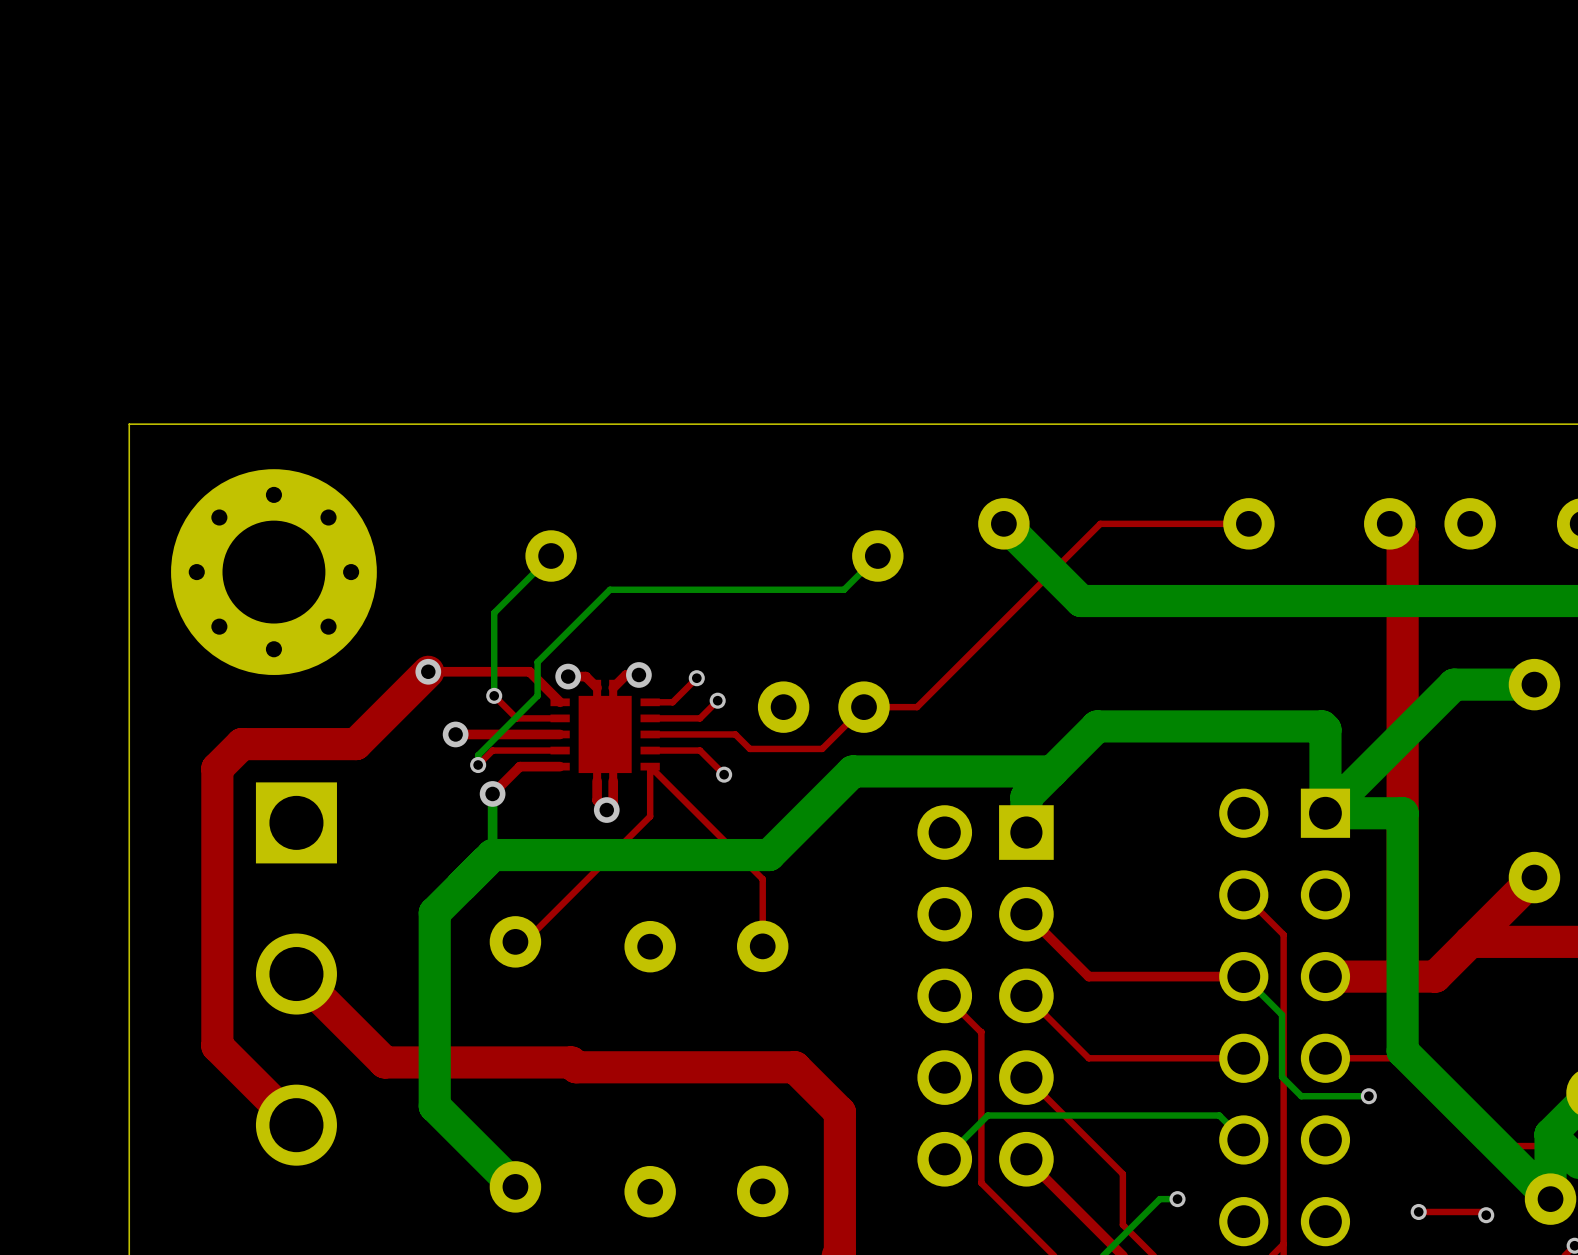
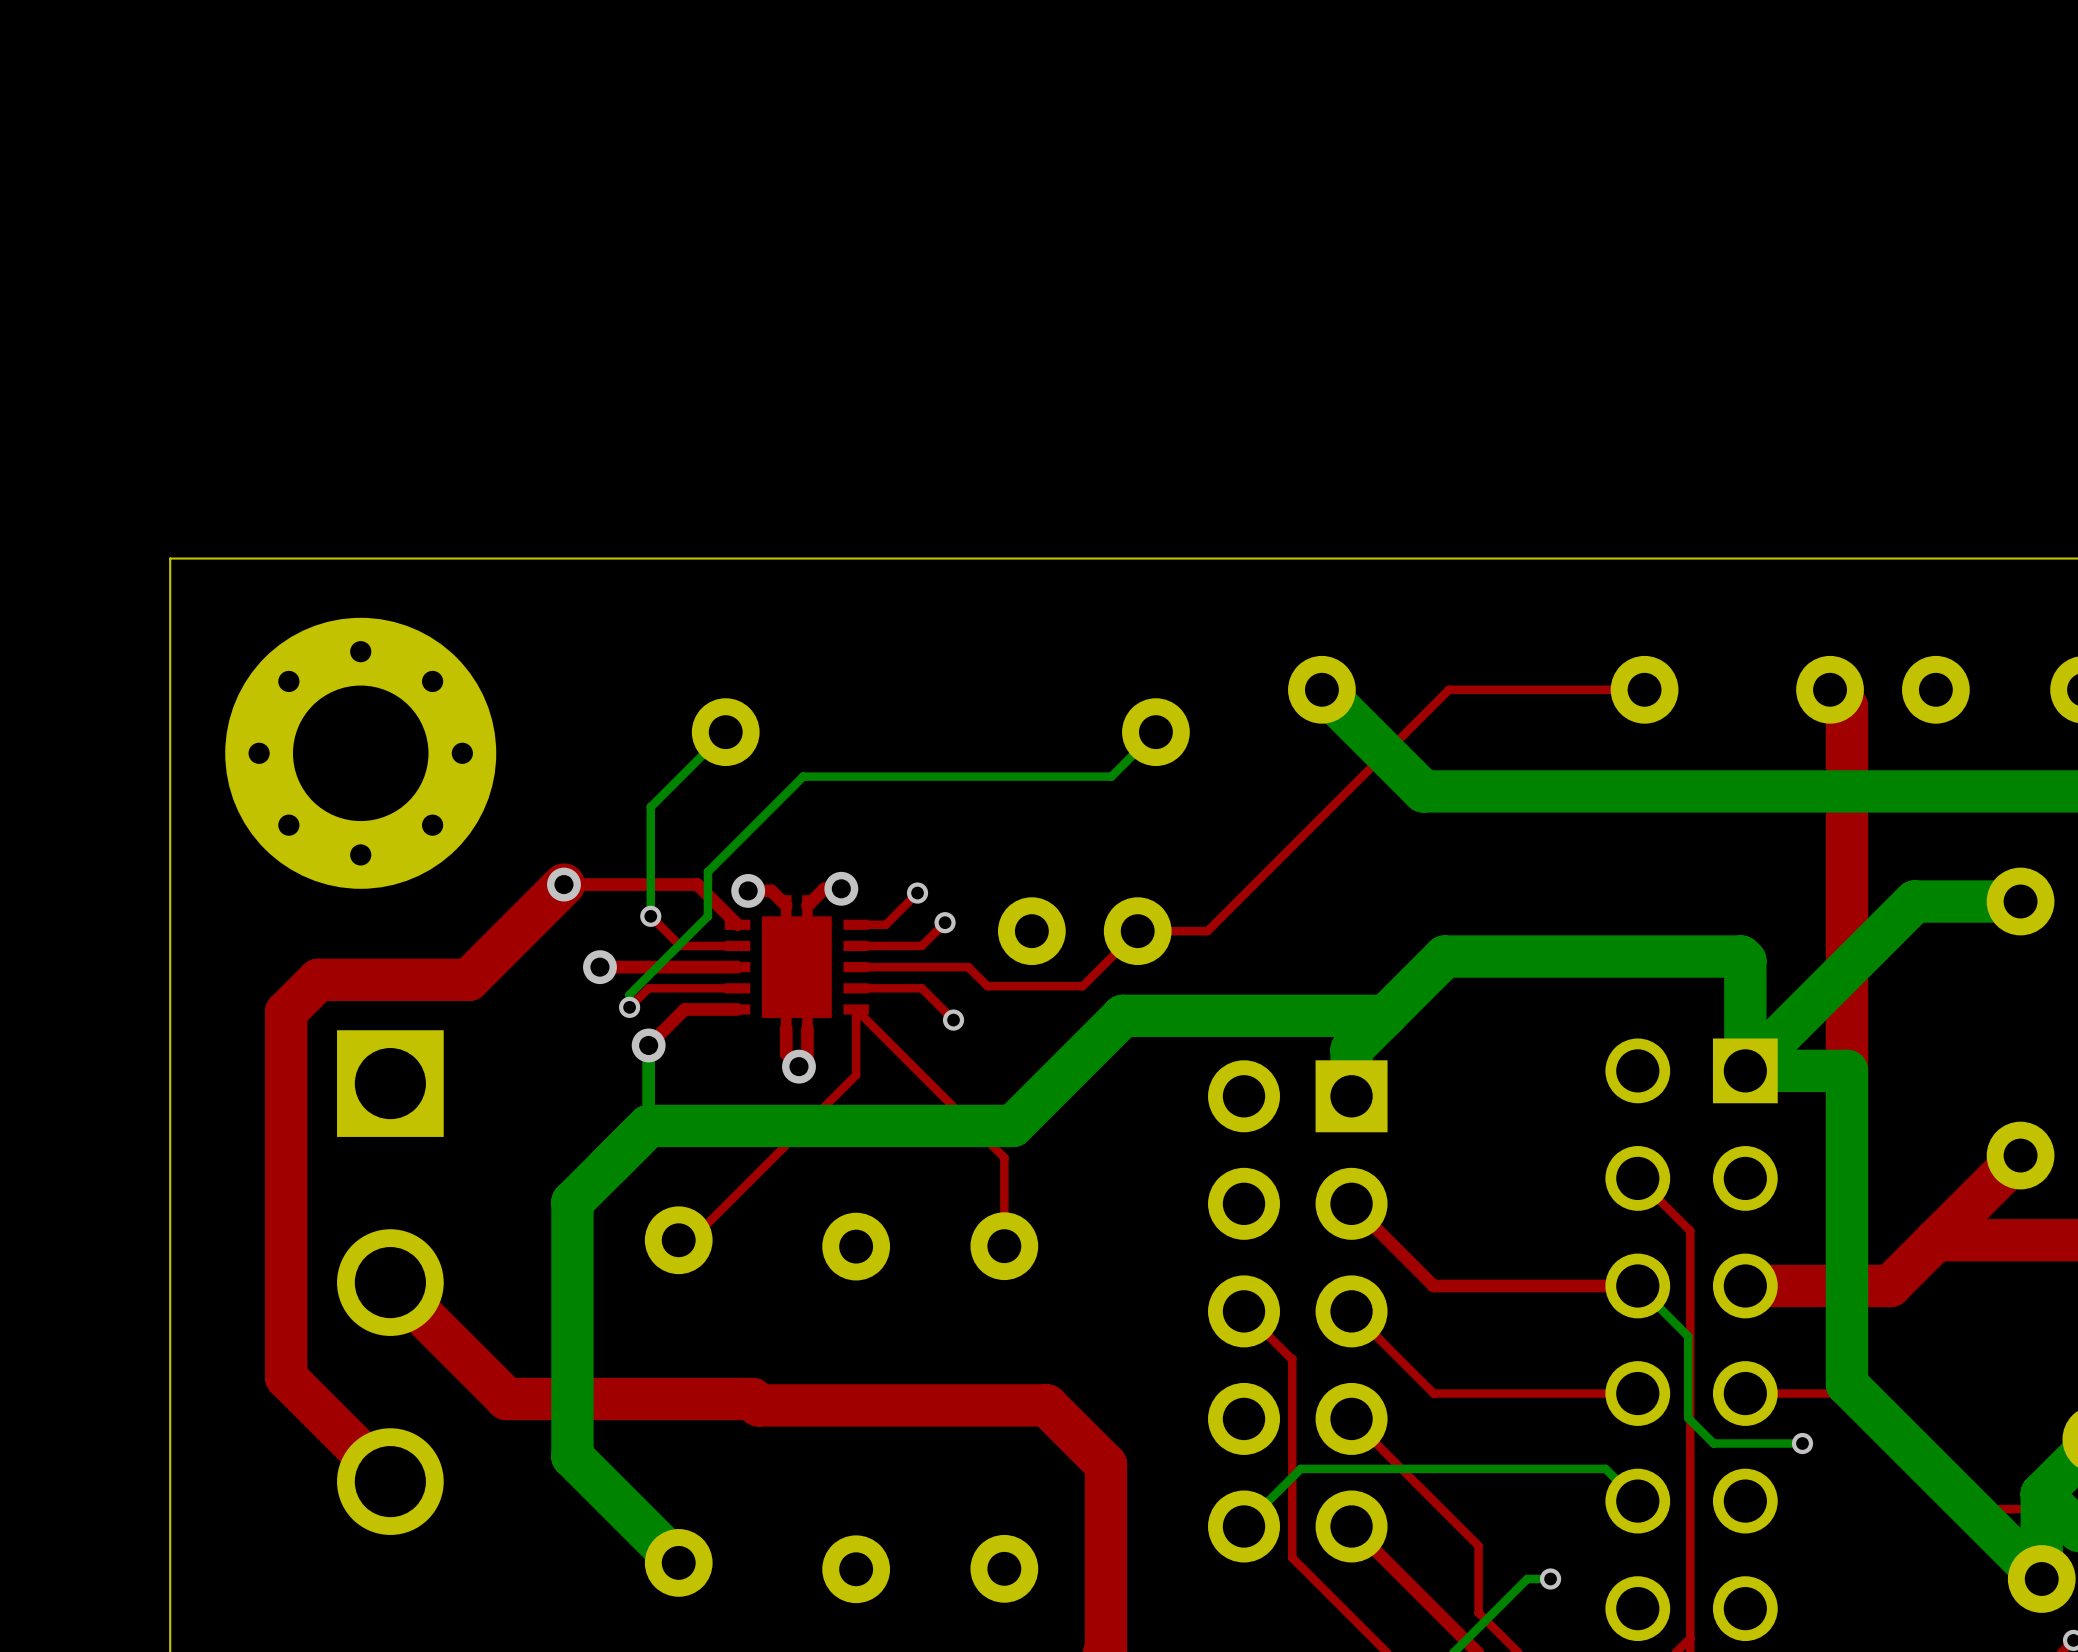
top track: (1418, 1211) (1483, 1211) (1486, 1215) -> none
via: (1418, 1211) -> none
via: (1486, 1215) -> none

